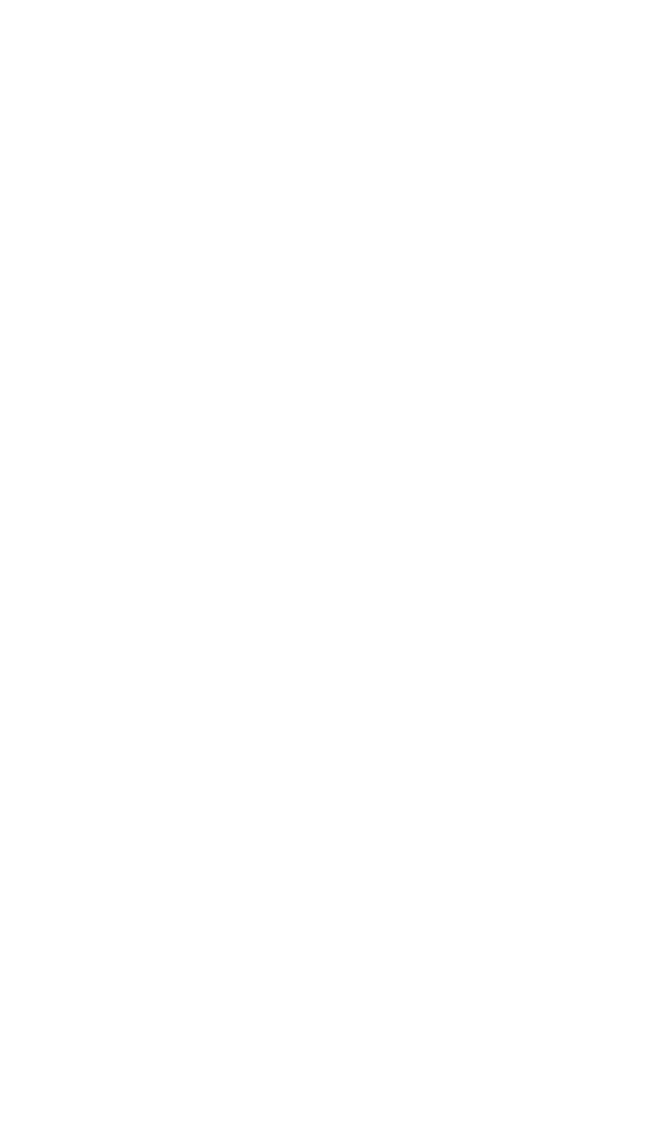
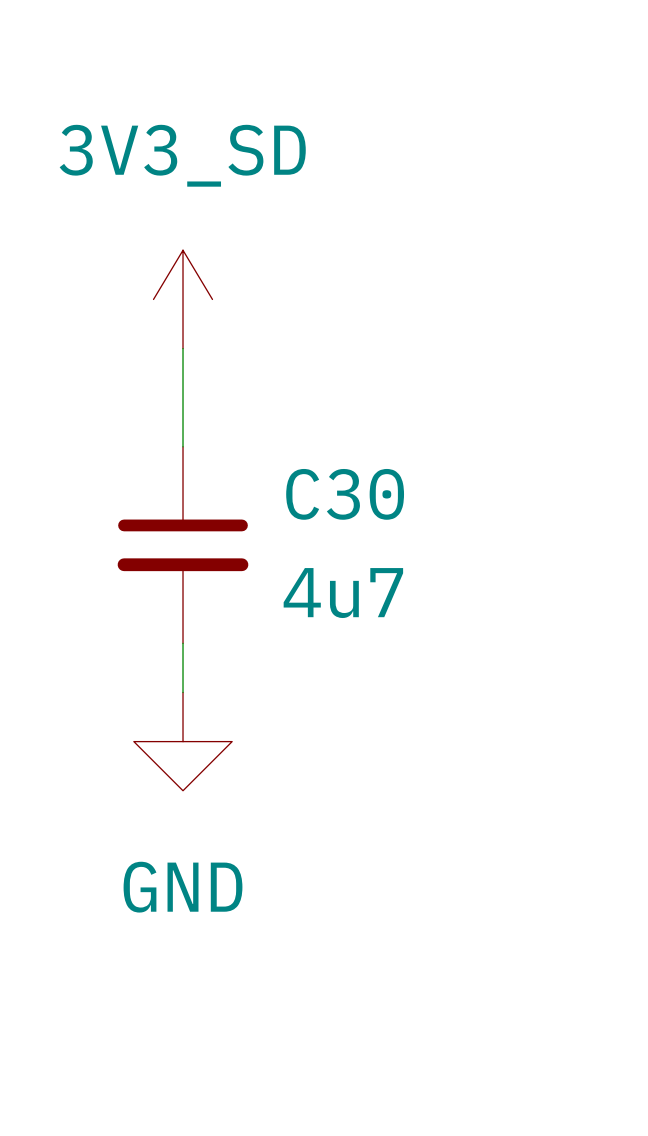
power symbol: none -> 3V3_SD (183, 299)
wire: none -> (183, 348) (183, 446)
C30: none -> 4u7 (183, 545)
wire: none -> (183, 643) (183, 692)
power symbol: none -> GND (183, 741)

